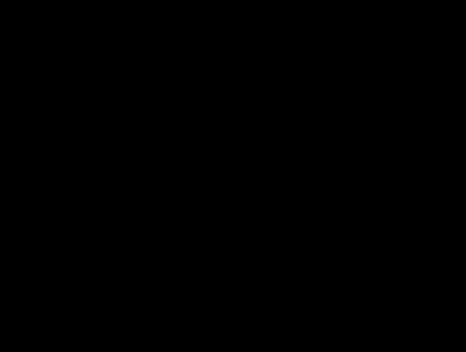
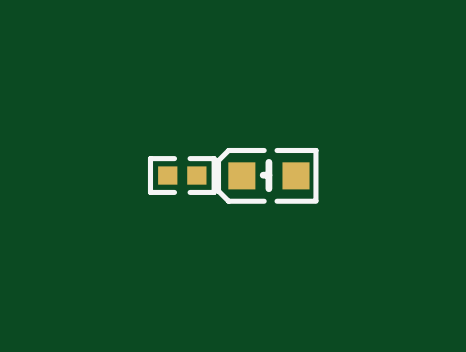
part: none -> (182, 175)
part: none -> (267, 175)

